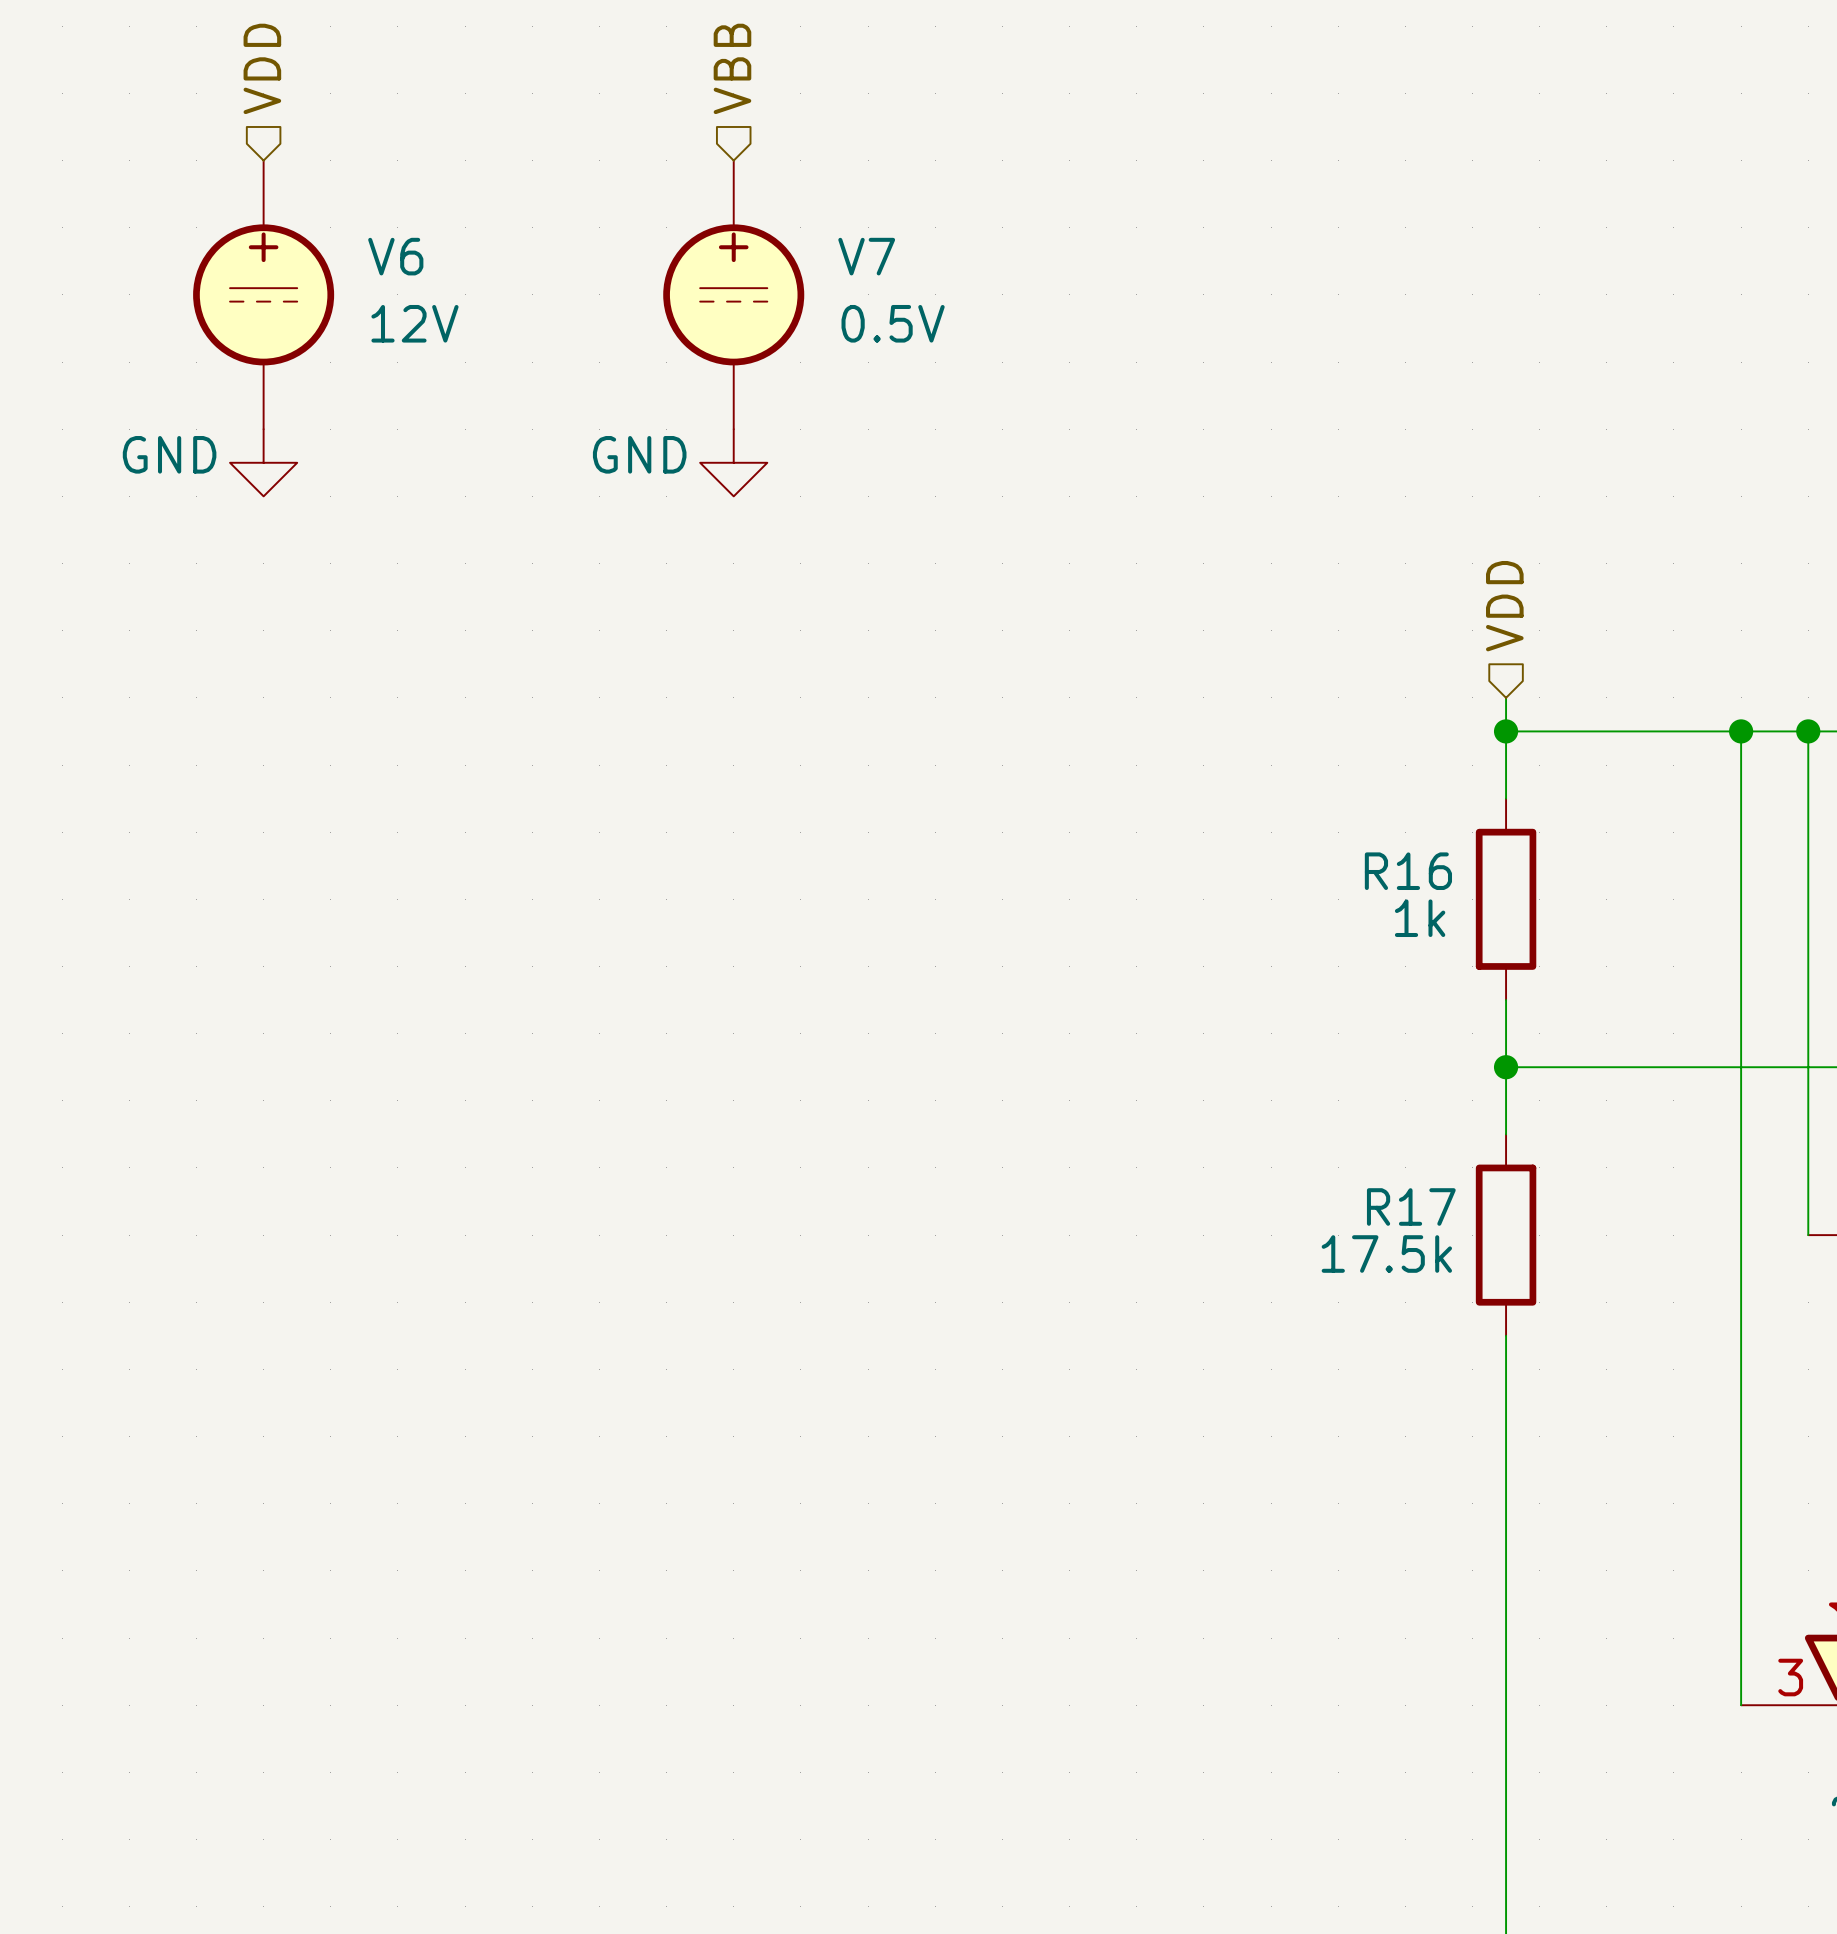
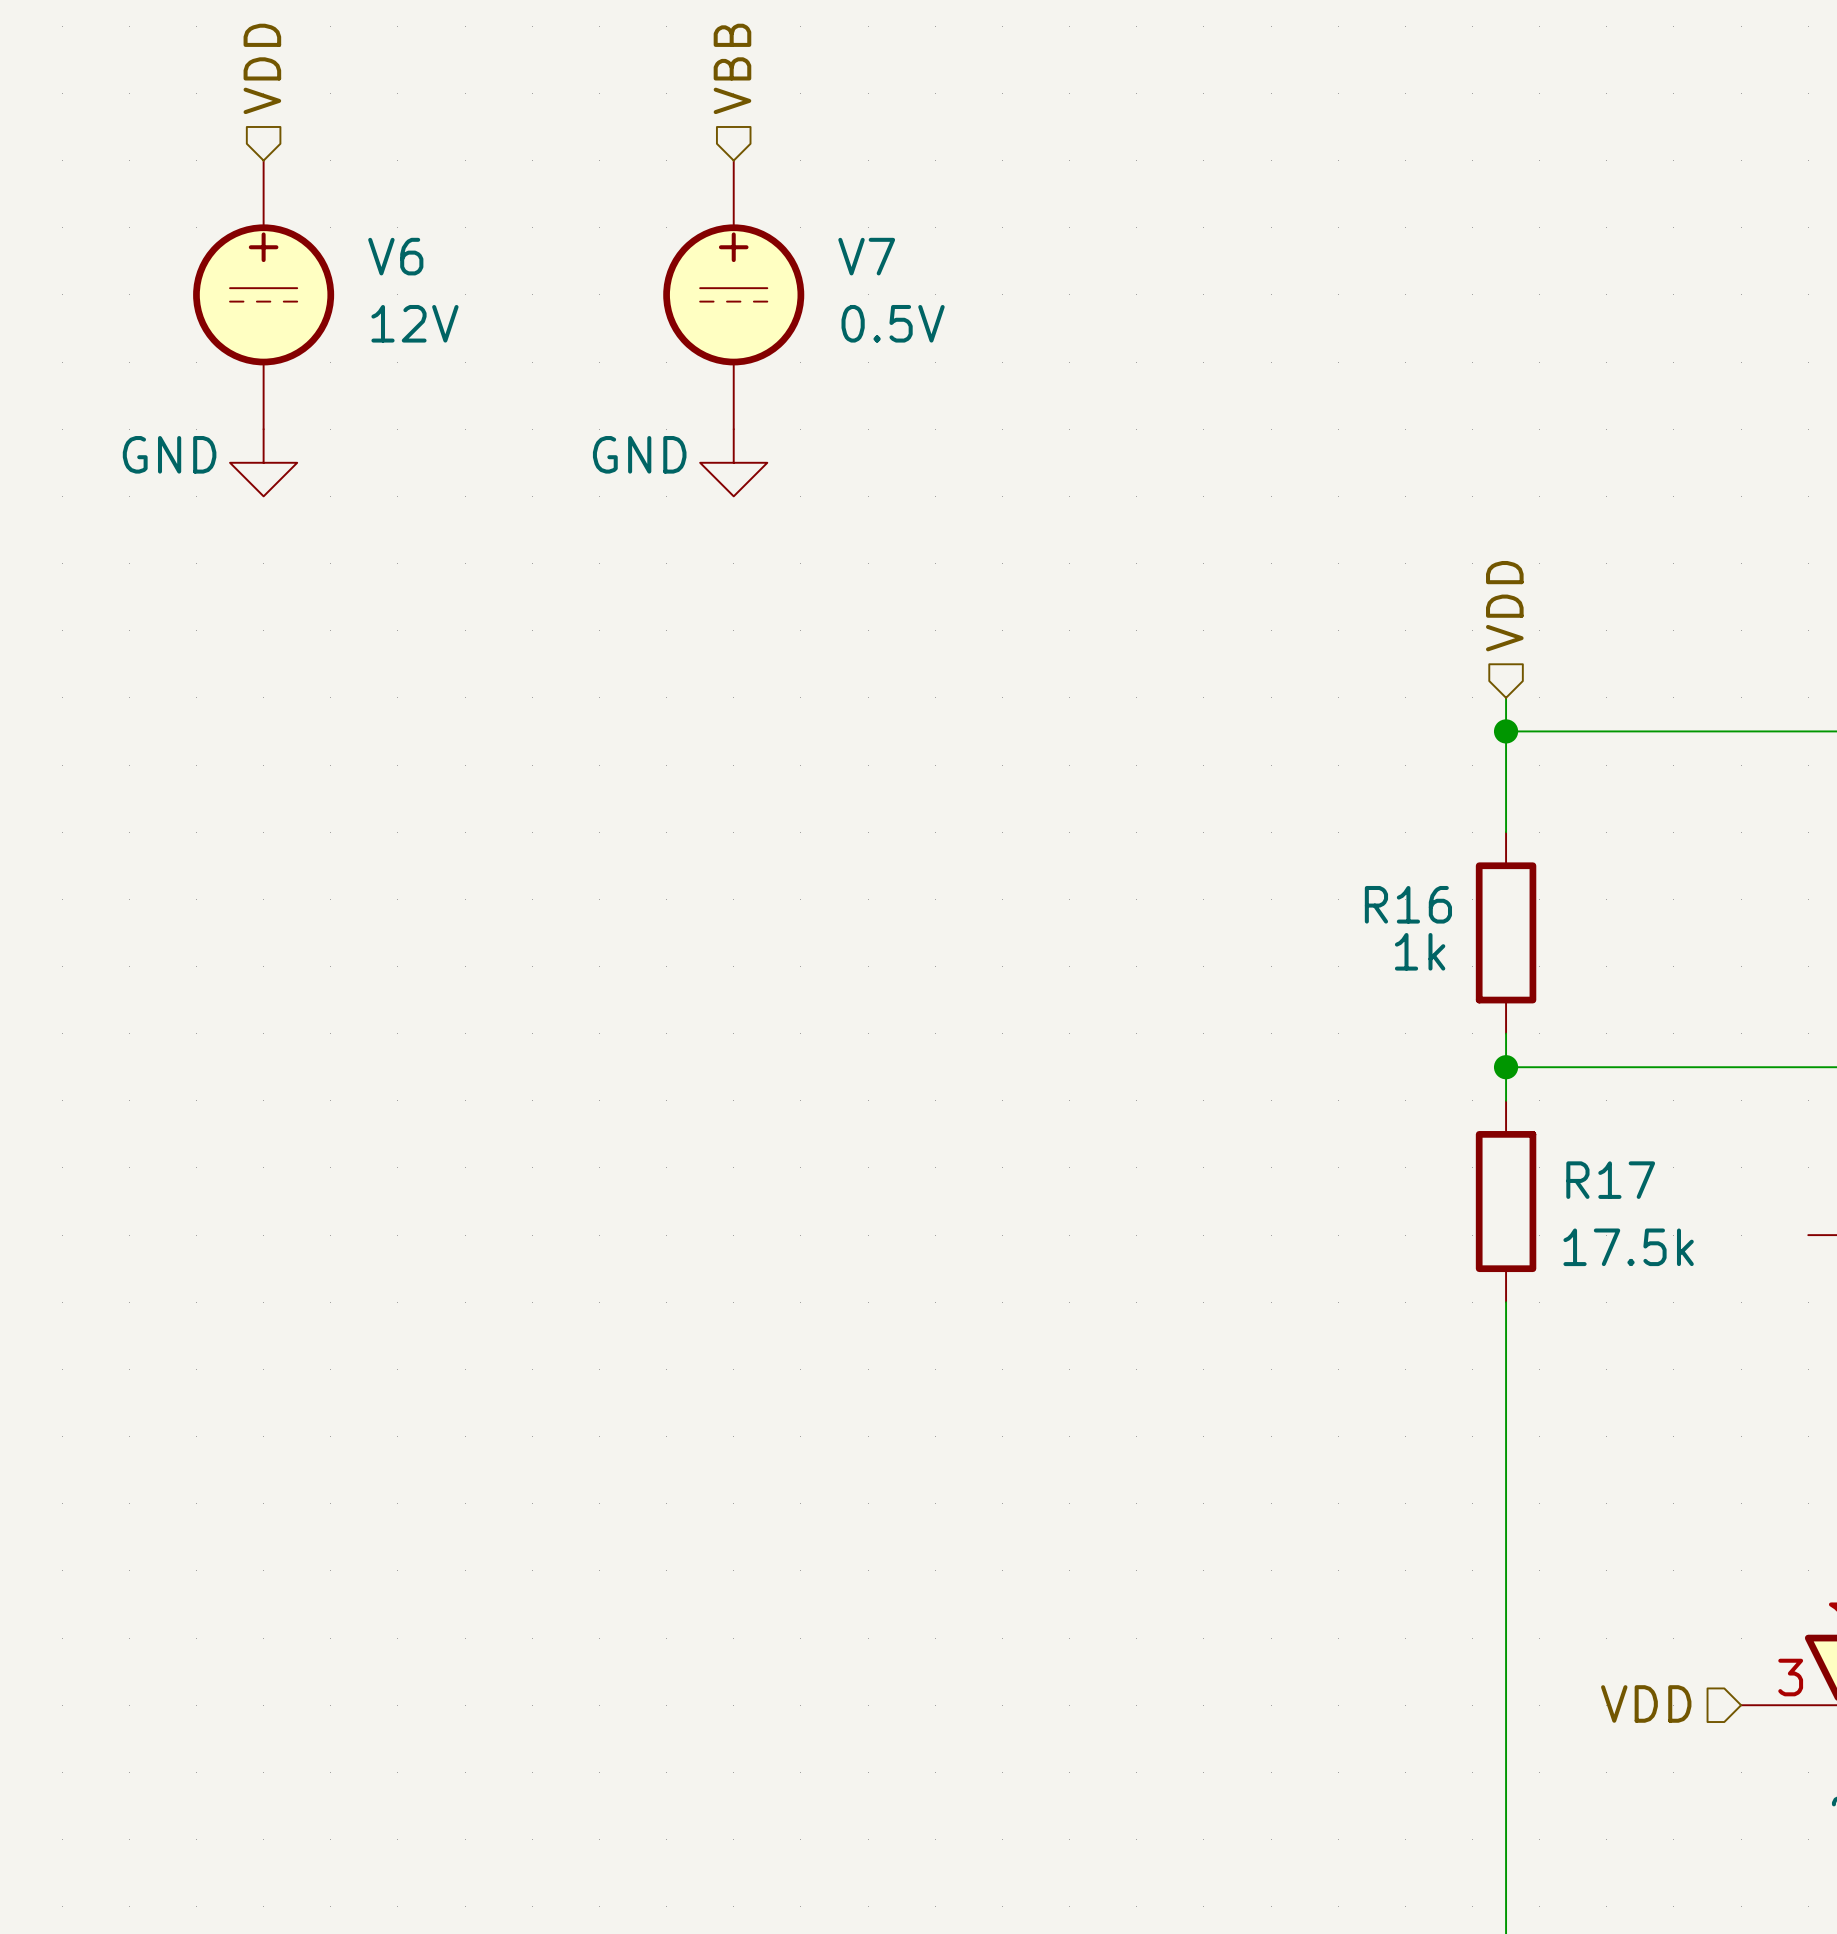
wire: (1741, 731) (1741, 1705) -> none
junction: (1741, 731) -> none
wire: (1808, 731) (1808, 1235) -> none
junction: (1808, 731) -> none
R16 position: (1506, 899) -> (1506, 932)
R17 name position: R17 (1411, 1206) -> R17 (1610, 1180)
R17 position: (1506, 1235) -> (1506, 1201)
R17 value position: 17.5k (1386, 1254) -> 17.5k (1628, 1247)
hierarchical label: none -> VDD (1646, 1703)

